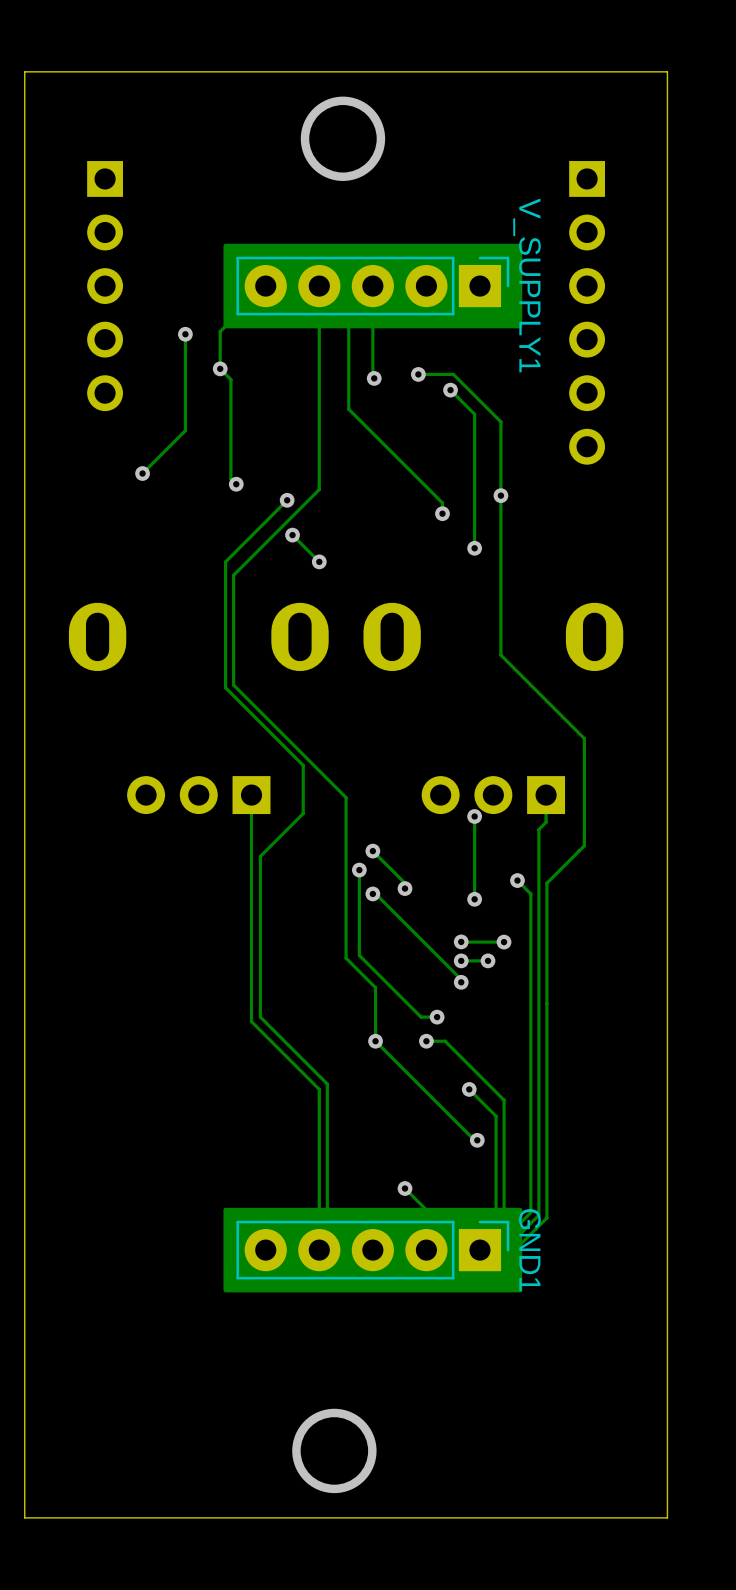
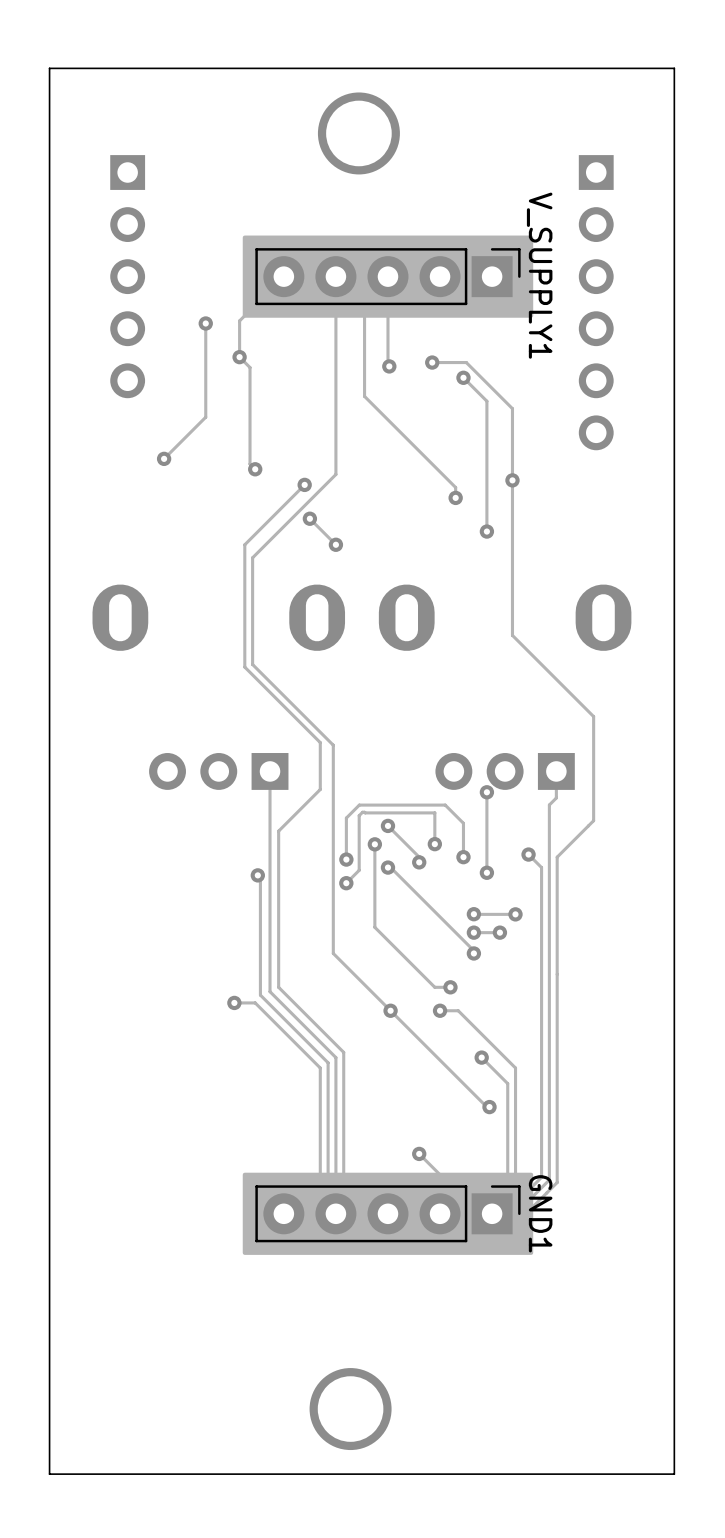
track: (316, 768) (346, 797) (346, 958) (375, 987) (375, 1041) -> (333, 745) (333, 953) (390, 1010)
track: none -> (434, 844) (434, 812) (362, 812) (359, 815) (359, 870) (346, 883)
via: none -> (434, 844)
track: none -> (463, 857) (463, 823) (445, 805) (359, 805) (346, 818) (346, 859)
via: none -> (463, 857)
via: none -> (346, 859)
track: none -> (257, 875) (260, 877) (260, 995) (328, 1062) (328, 1205)
via: none -> (257, 875)
via: none -> (346, 883)
track: none -> (234, 1002) (255, 1002) (320, 1068) (320, 1198) (335, 1213)
via: none -> (234, 1002)

